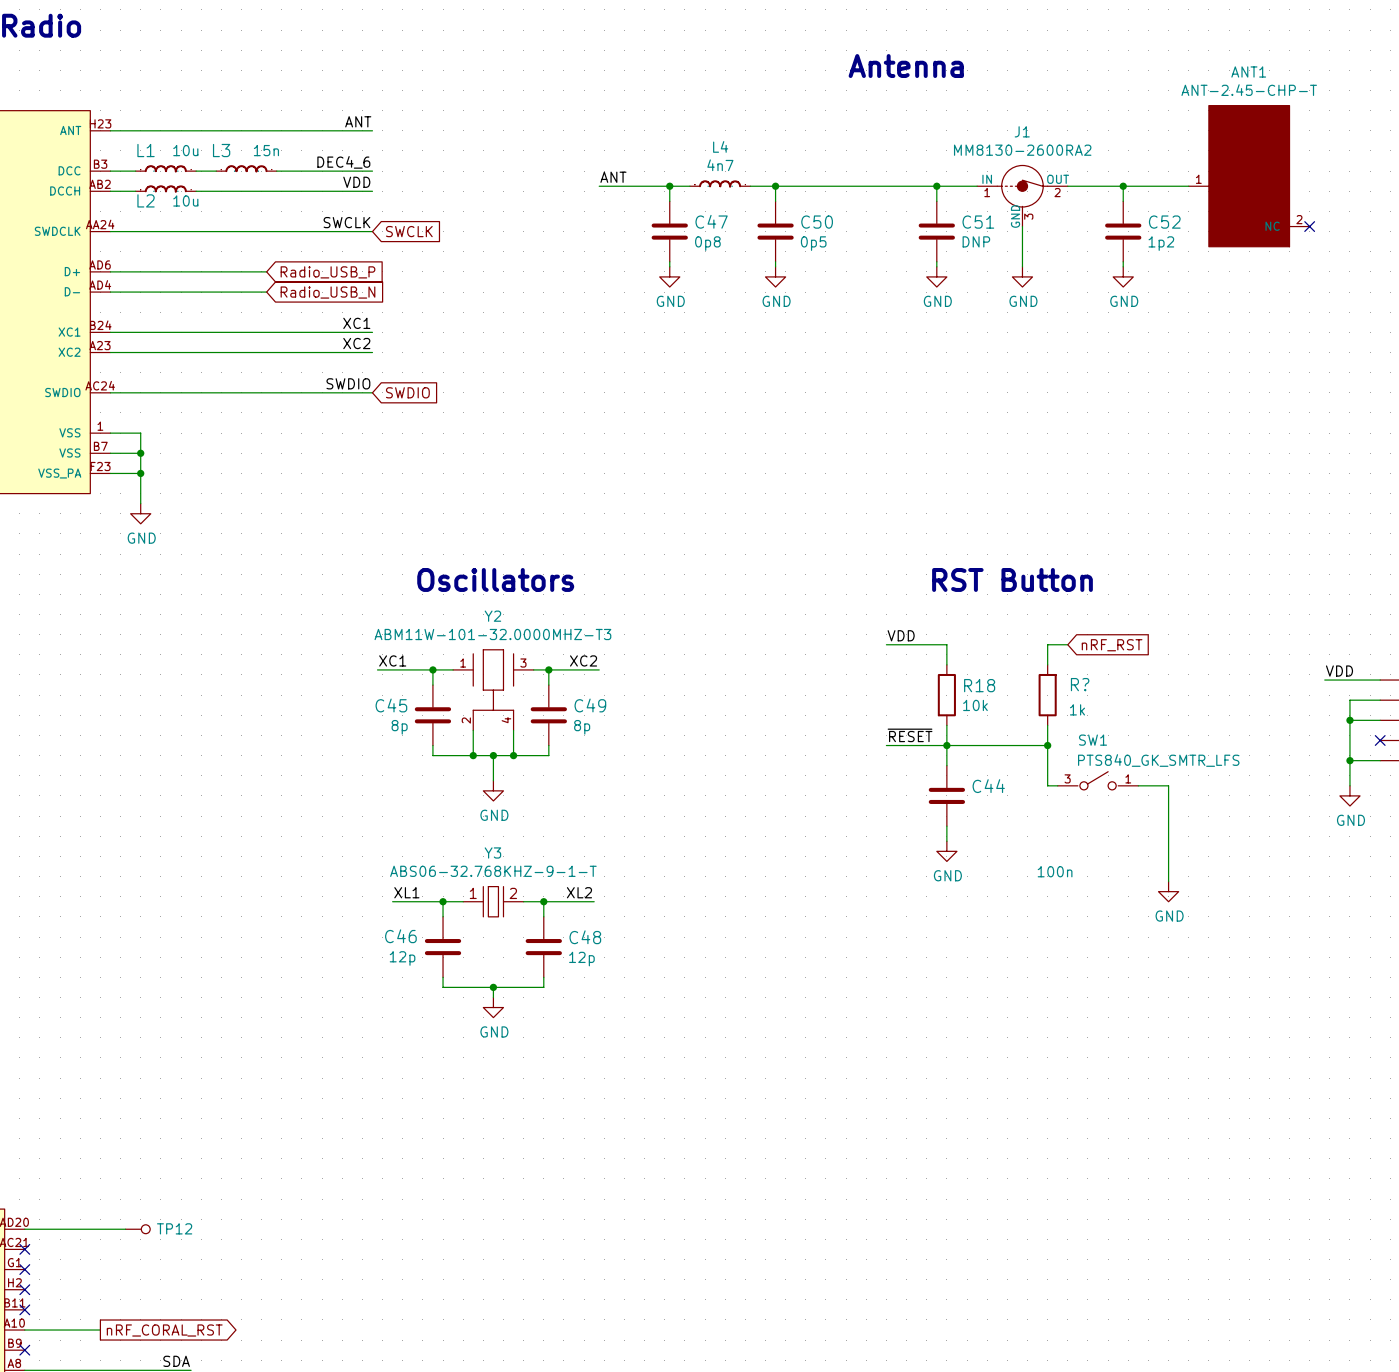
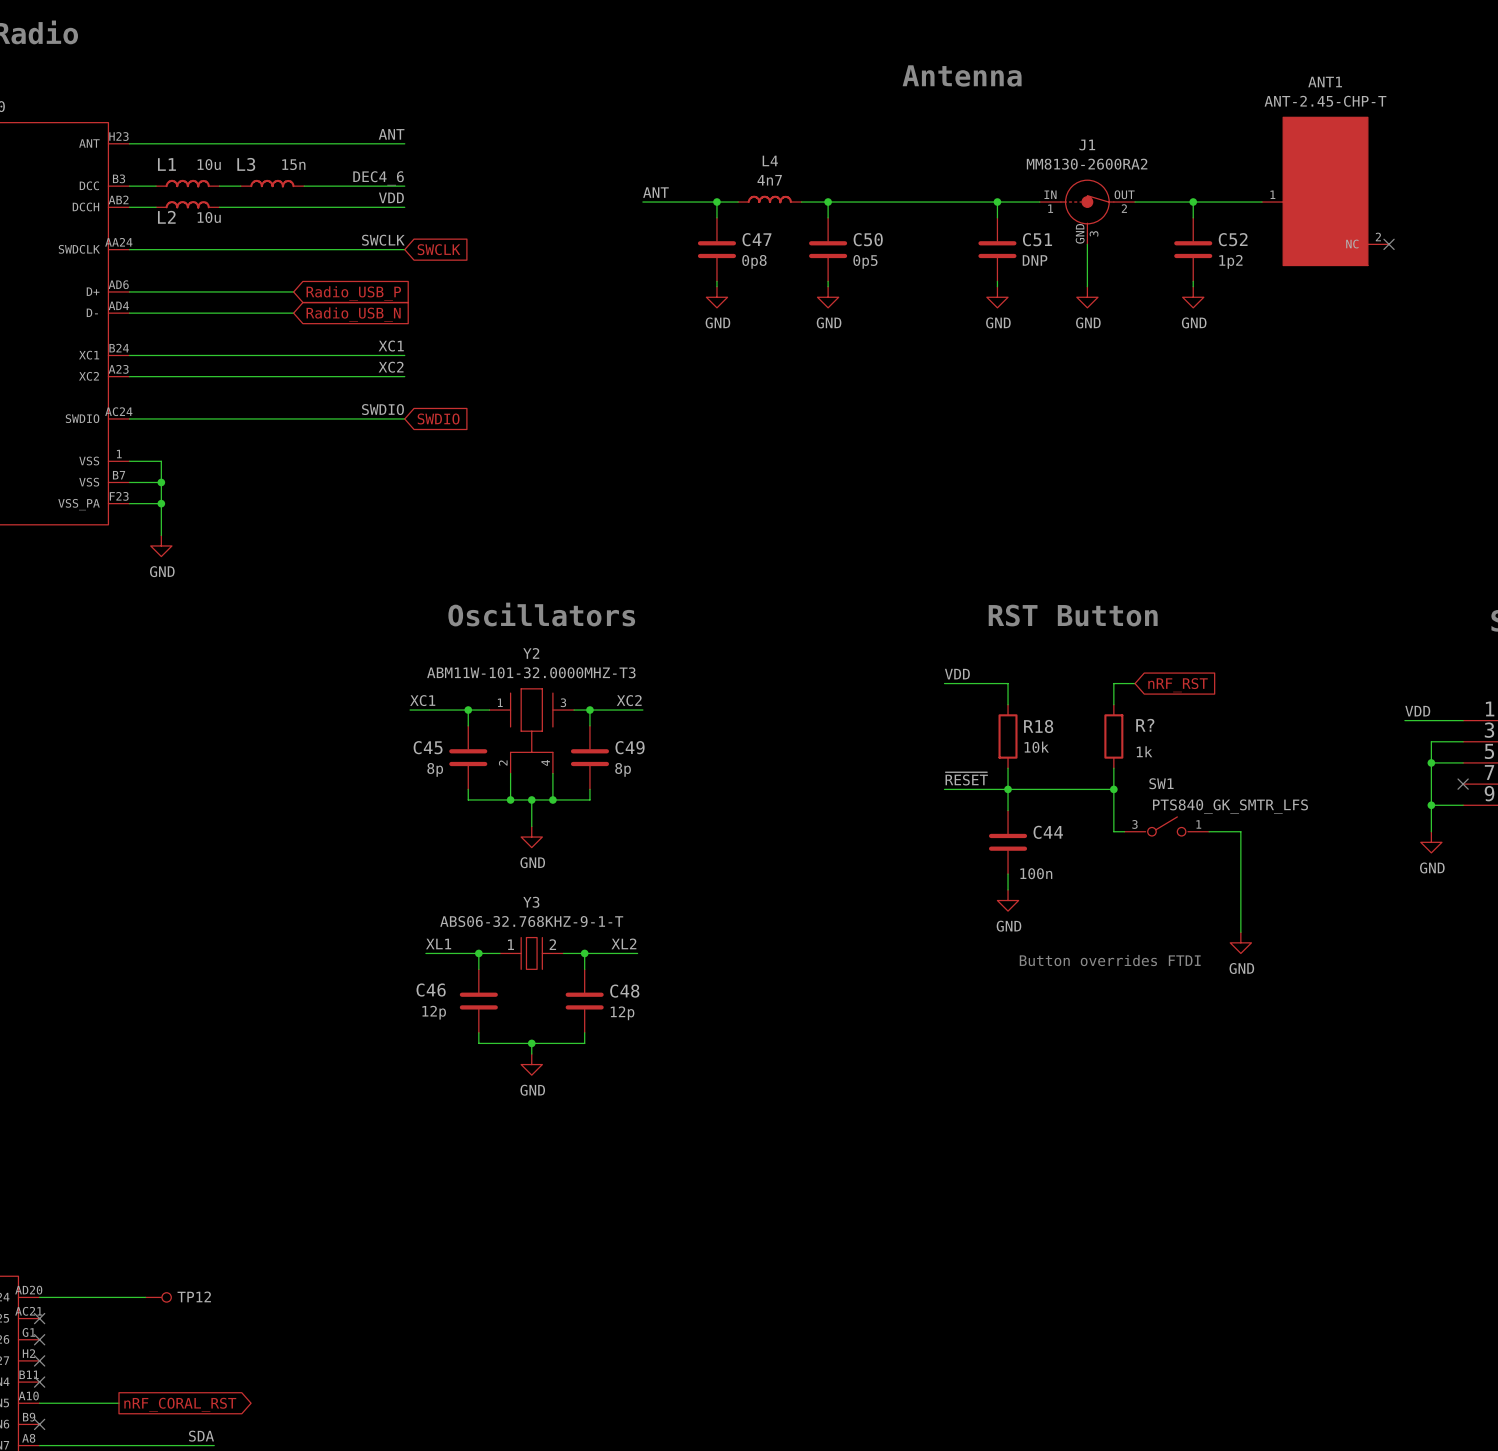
C44 text position: 100n (1055, 871) -> 100n (1036, 873)
text: none -> Button overrides FTDI (1110, 960)

